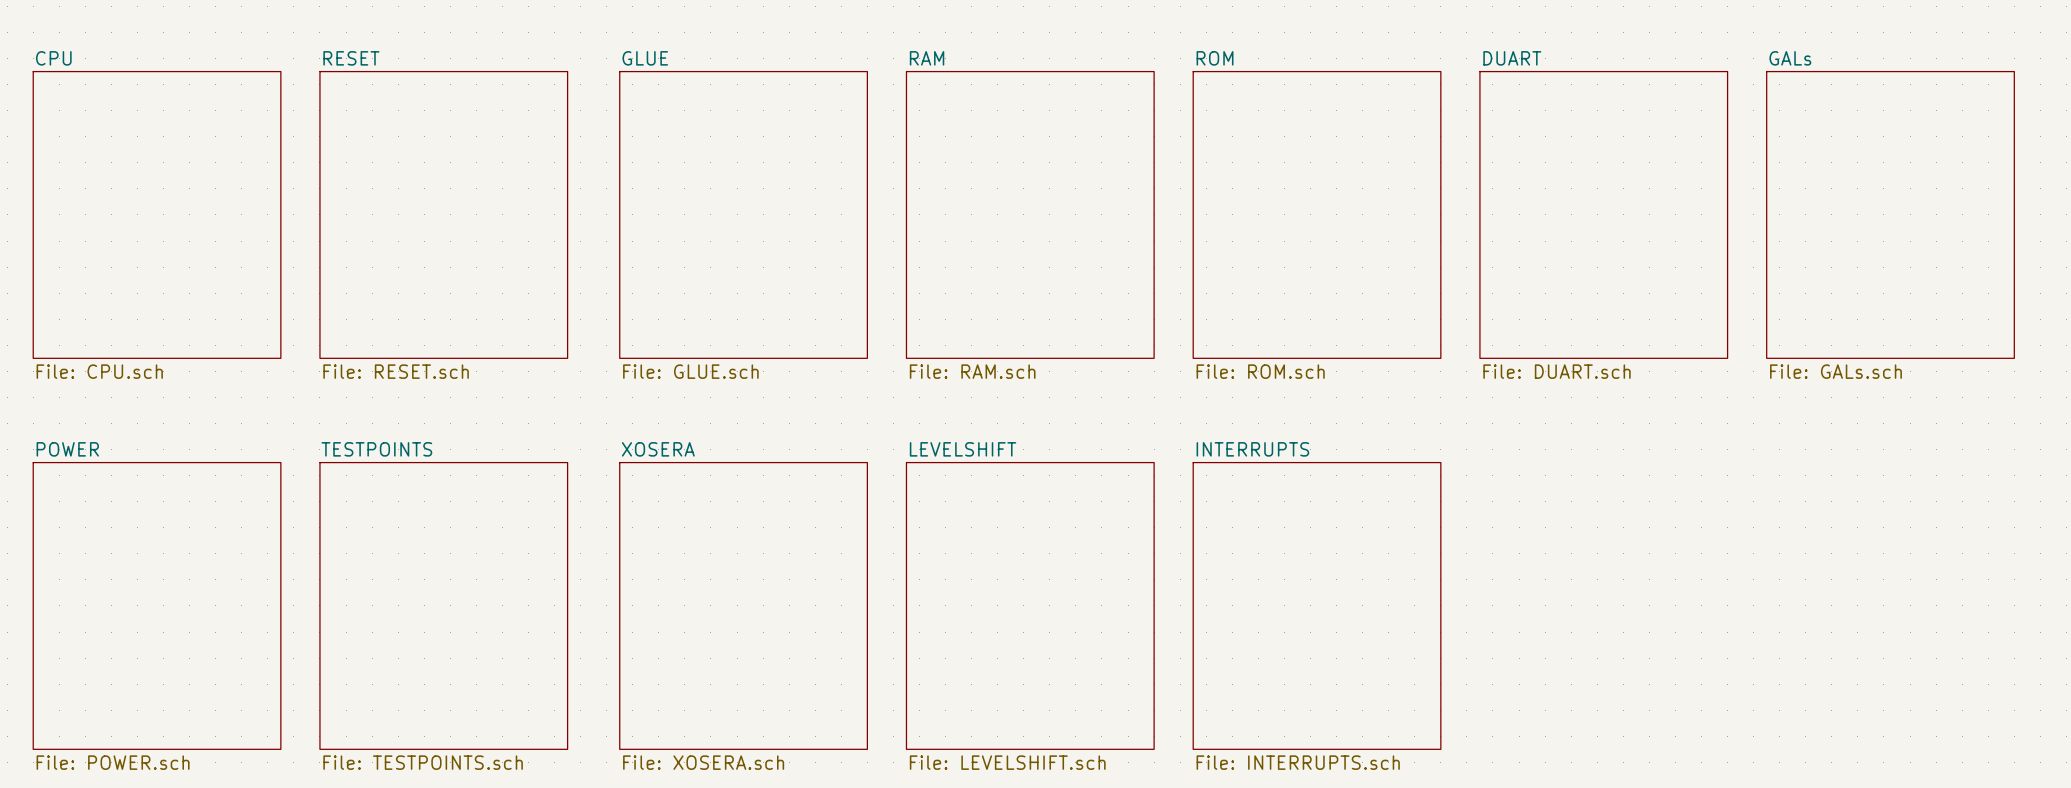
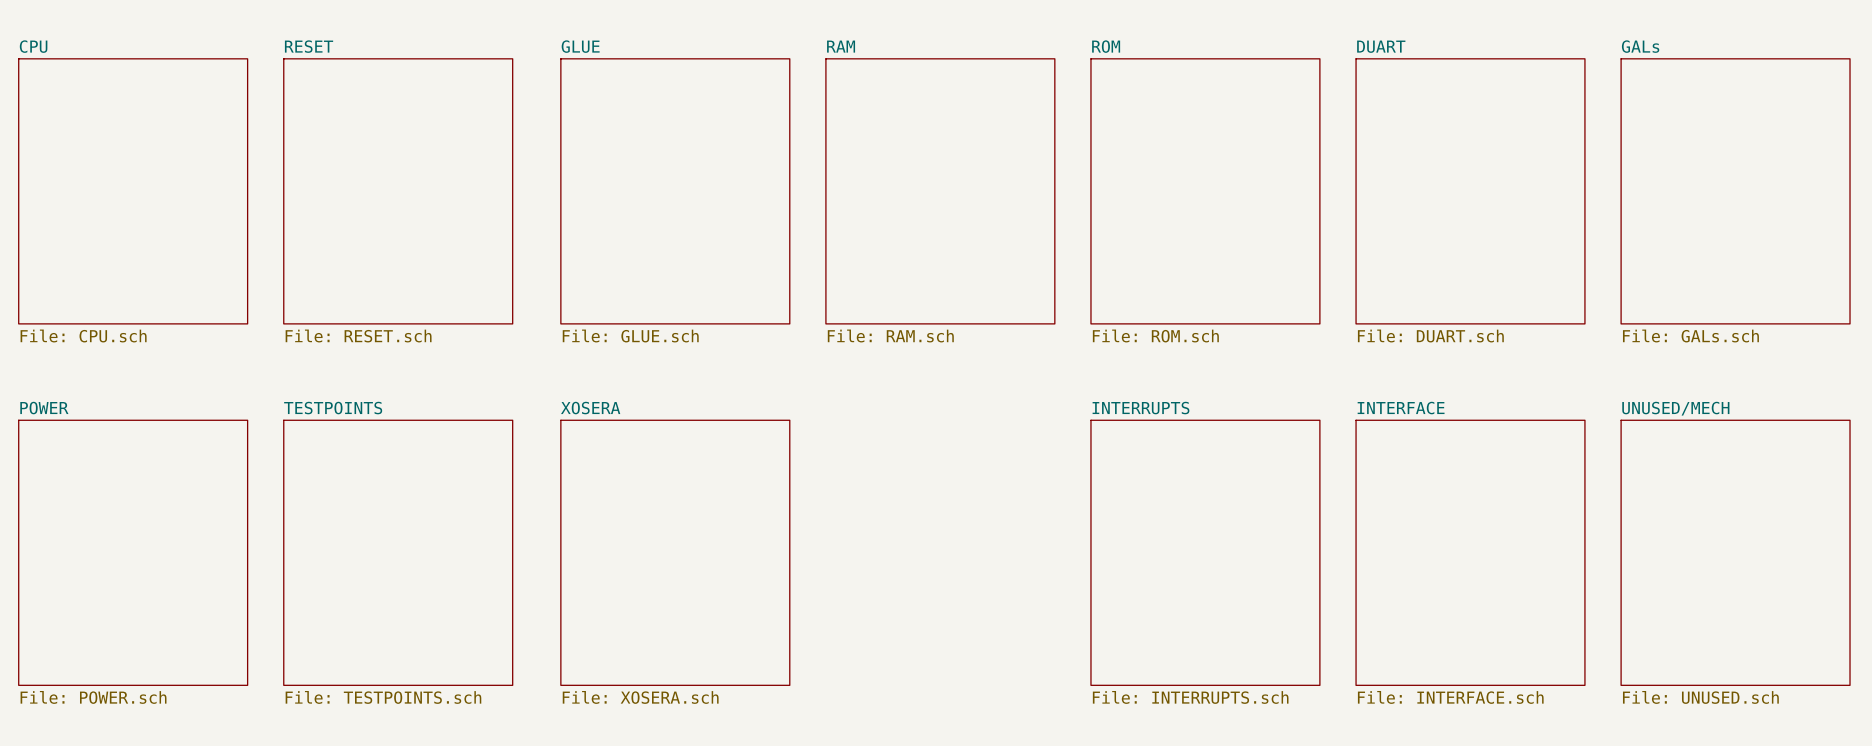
sheet LEVELSHIFT: File: LEVELSHIFT.sch (1030, 605) -> none
sheet INTERFACE: none -> File: INTERFACE.sch (1470, 552)
sheet UNUSED/MECH: none -> File: UNUSED.sch (1735, 552)

